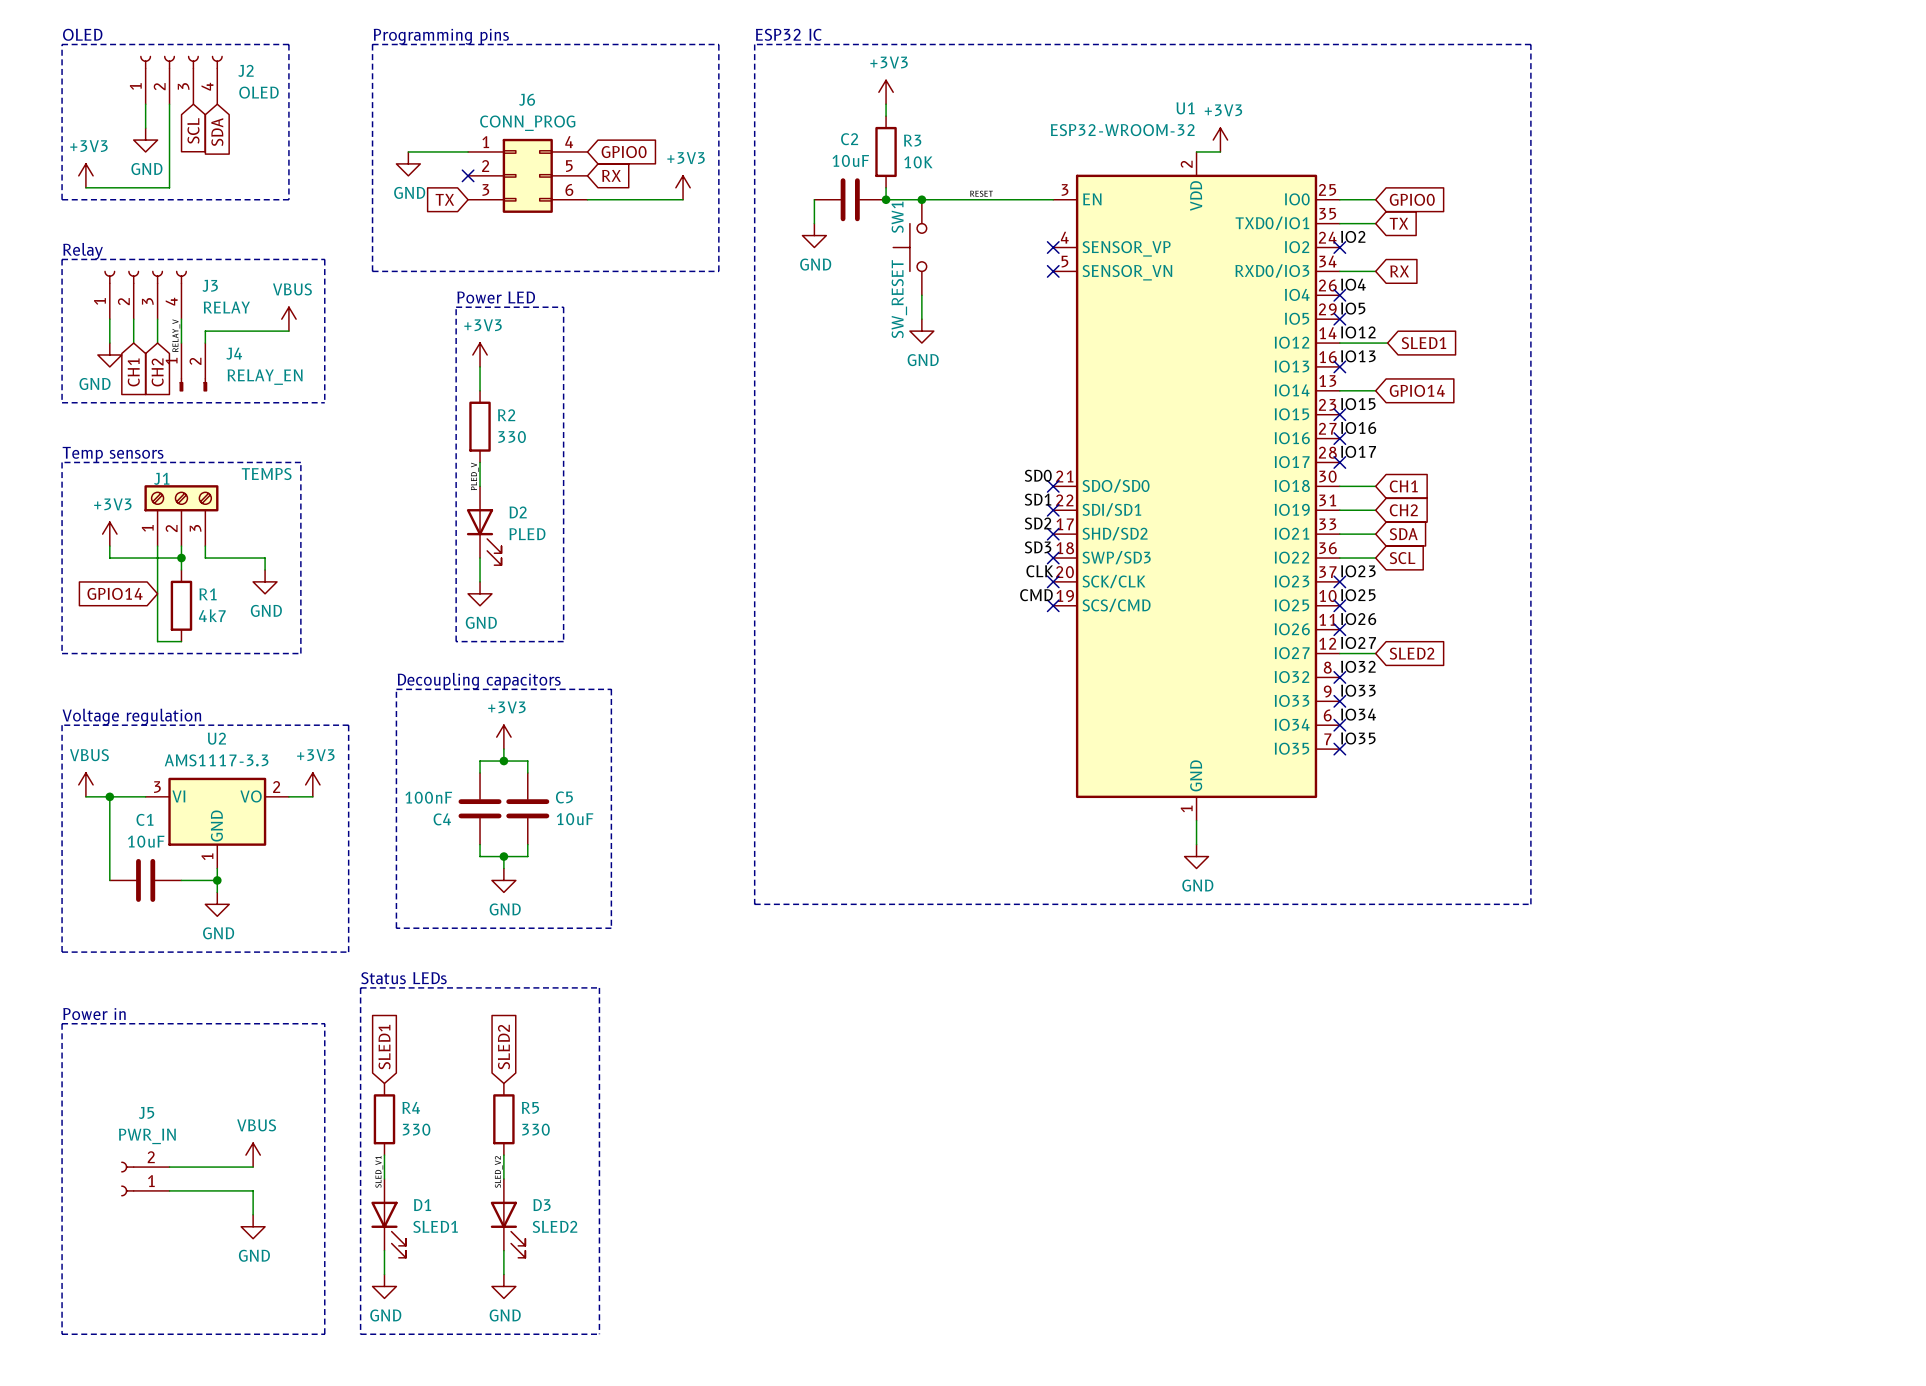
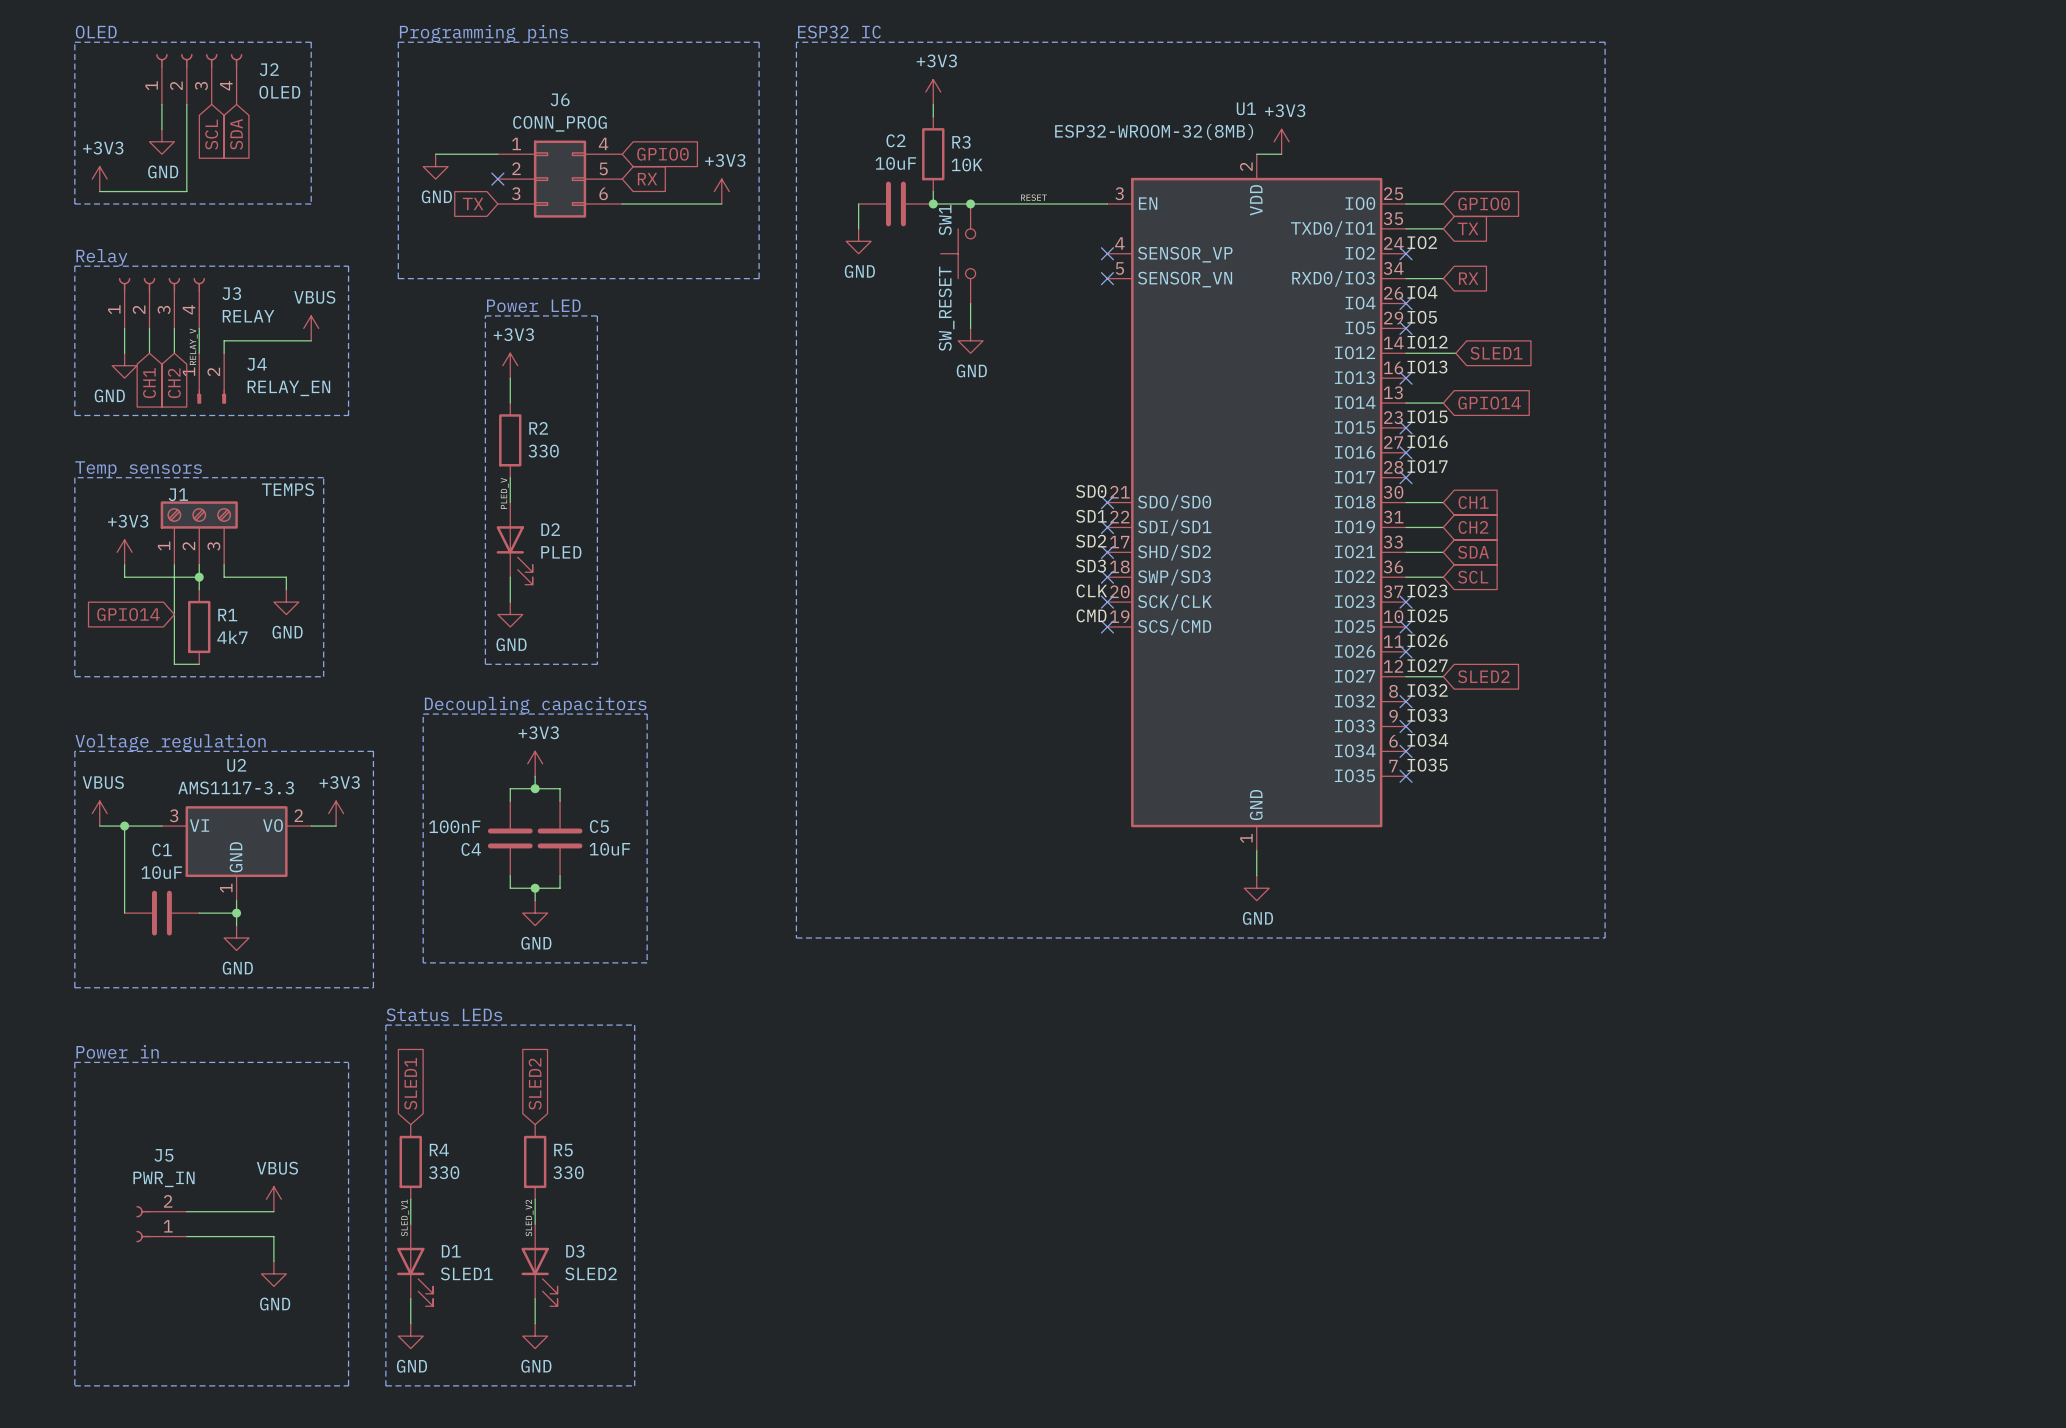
U1 value: ESP32-WROOM-32 (1122, 130) -> ESP32-WROOM-32(8MB) (1154, 132)

